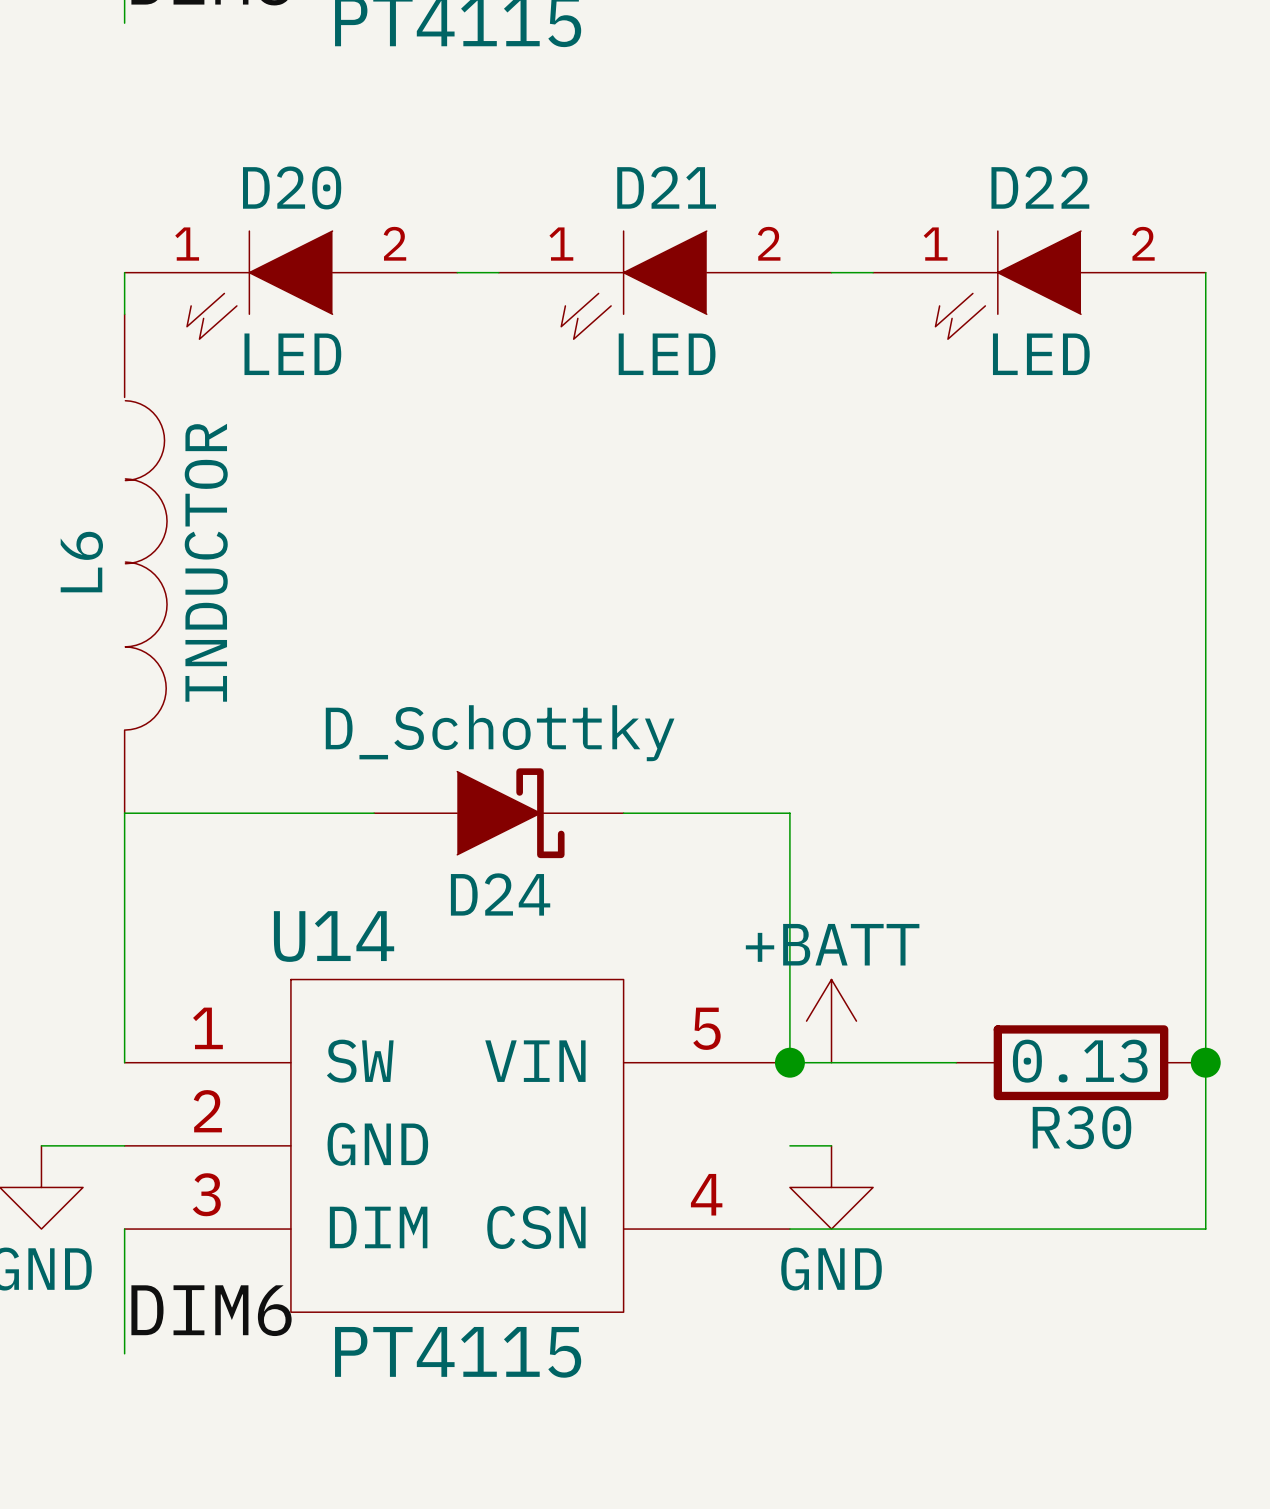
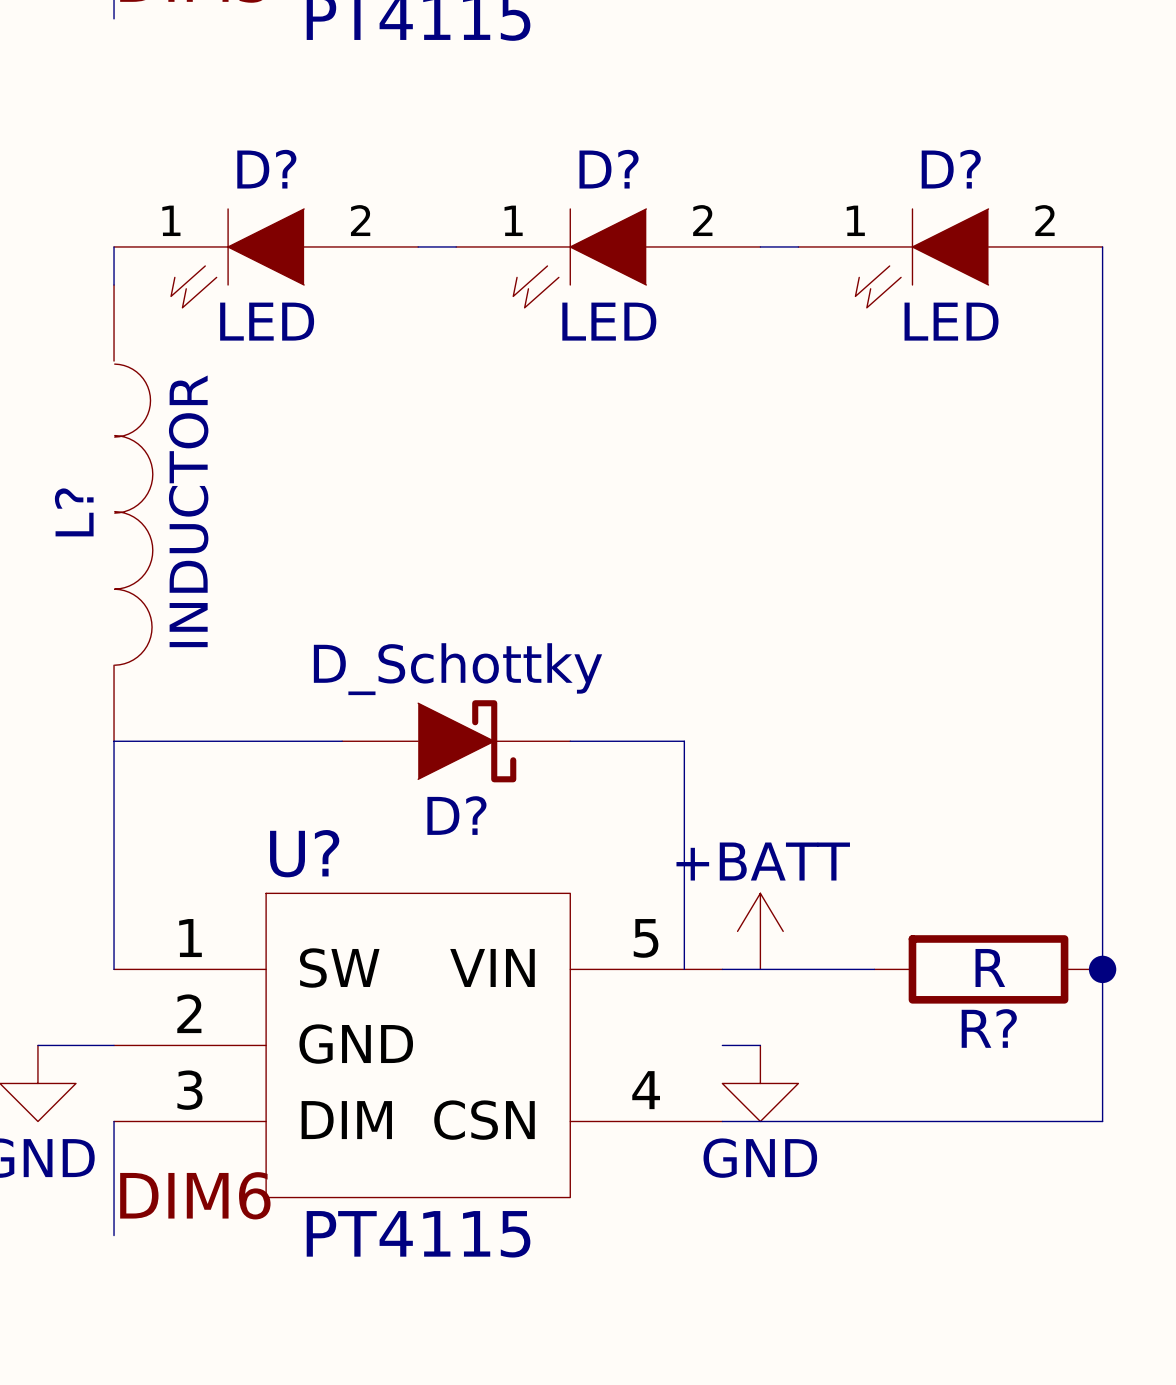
D20 name: D20 (292, 187) -> D? (266, 169)
D21 name: D21 (666, 187) -> D? (609, 169)
D22 name: D22 (1040, 187) -> D? (951, 169)
L6 name: L6 (81, 562) -> L? (74, 512)
wire: (748, 813) (789, 813) (789, 1062) -> (684, 741) (684, 969)
D24 name: D24 (500, 894) -> D? (456, 815)
U14 name: U14 (334, 936) -> U? (304, 853)
R30 value: 0.13 (1080, 1061) -> R (990, 967)
junction: (789, 1062) -> none
R30 name: R30 (1082, 1127) -> R? (989, 1028)

